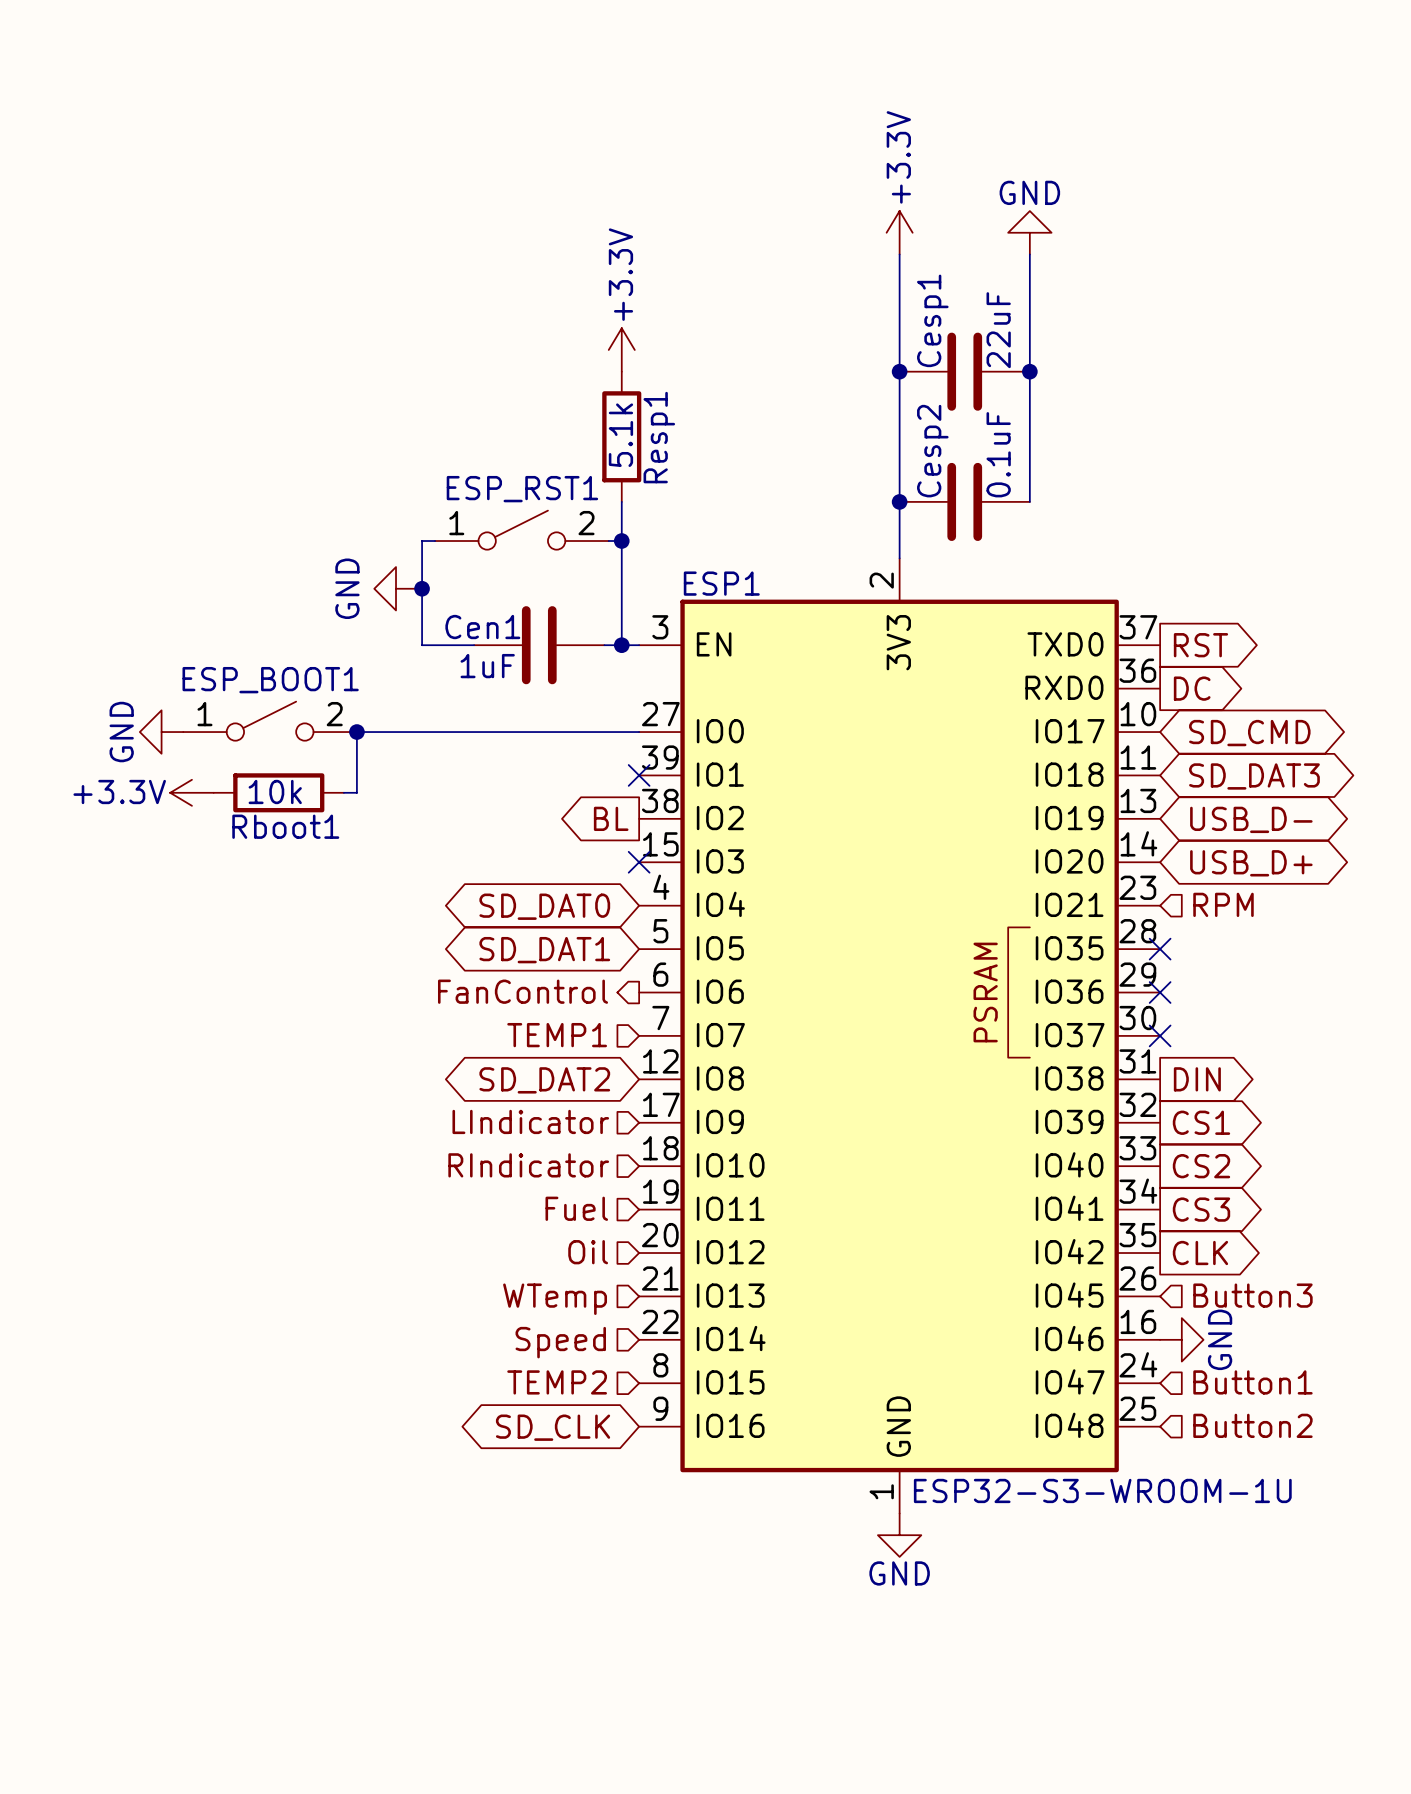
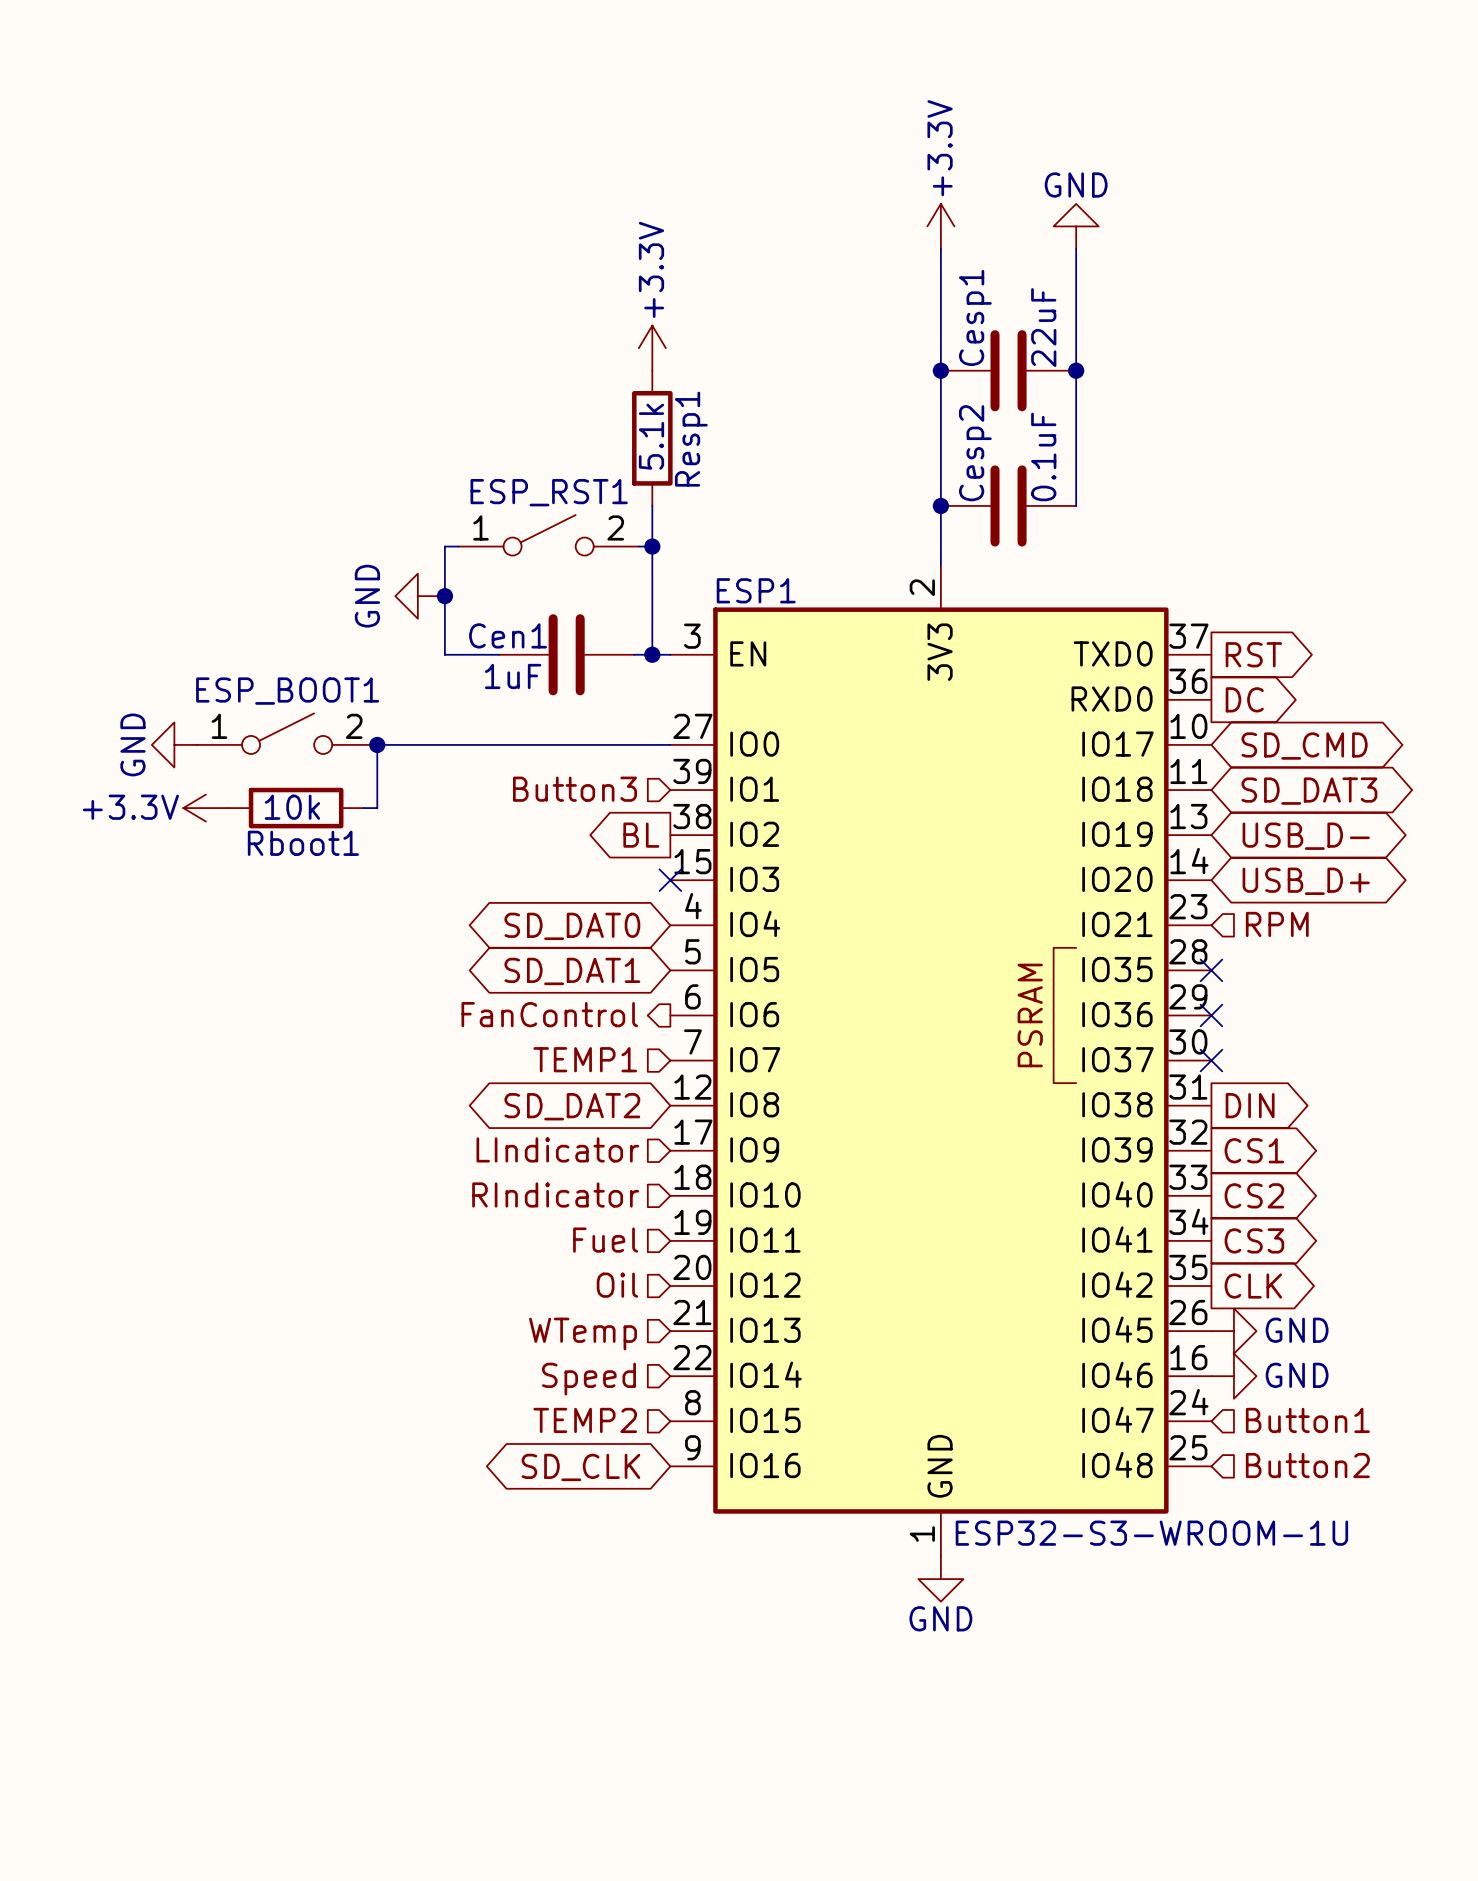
hierarchical label: none -> Button3 (575, 789)
no-connect mark: (639, 775) -> none
hierarchical label: Button3 (1252, 1295) -> none
power symbol: none -> GND (1233, 1331)
power symbol text rotation: 0° (1220, 1339) -> 90° clockwise (1297, 1375)

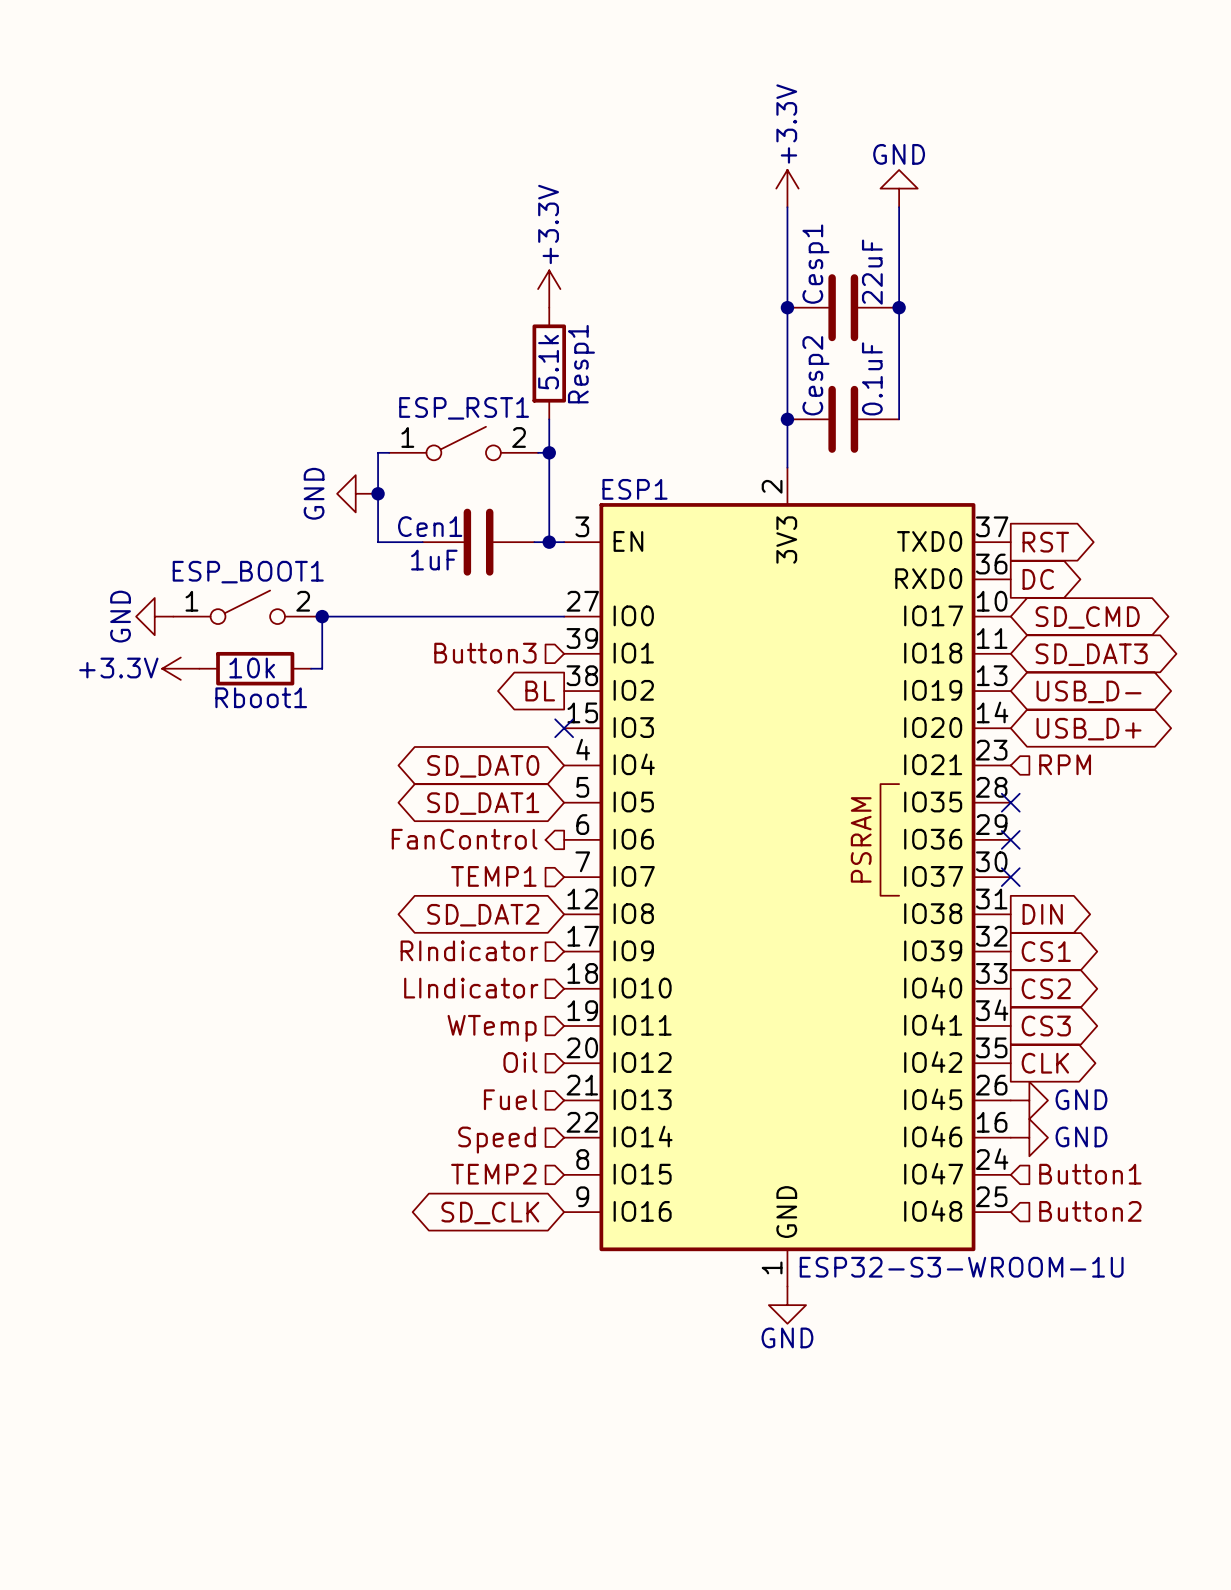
hierarchical label: LIndicator (557, 1149) -> RIndicator (469, 950)
hierarchical label: RIndicator (555, 1194) -> LIndicator (471, 988)
hierarchical label: Fuel (605, 1240) -> WTemp (492, 1028)
hierarchical label: WTemp (583, 1334) -> Fuel (510, 1099)

